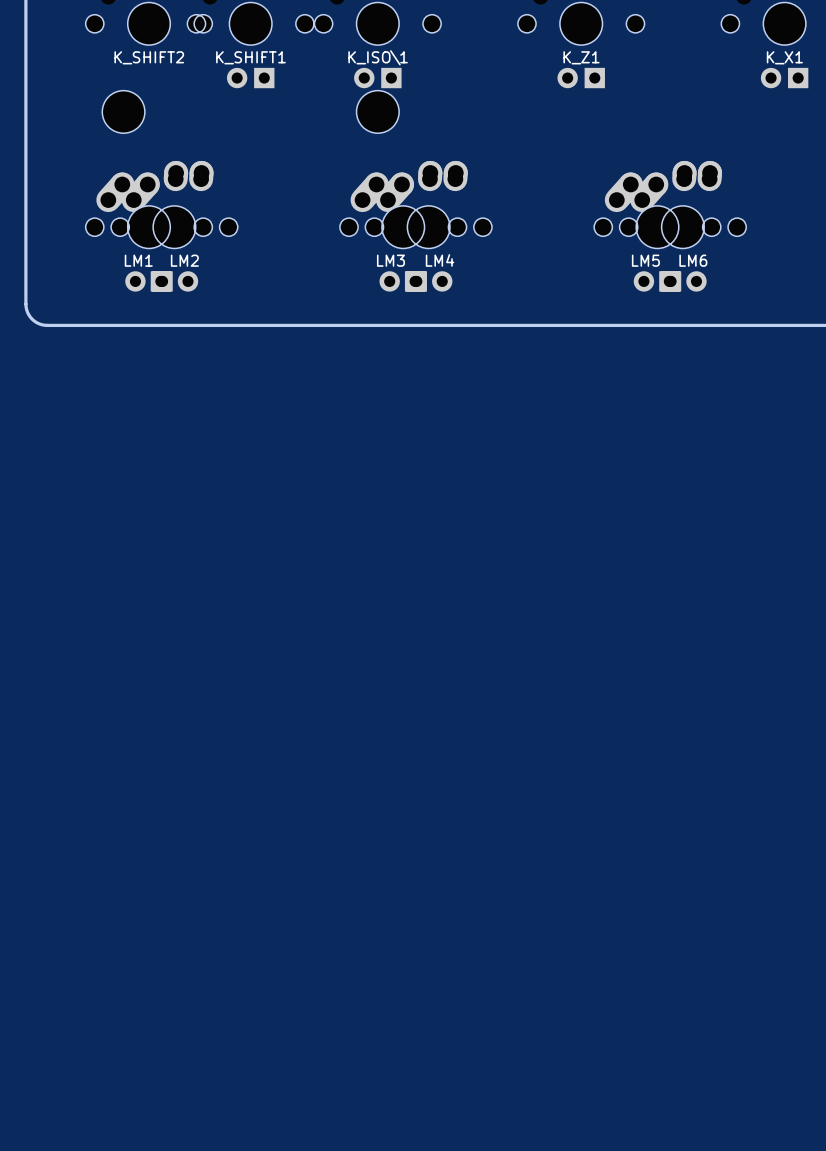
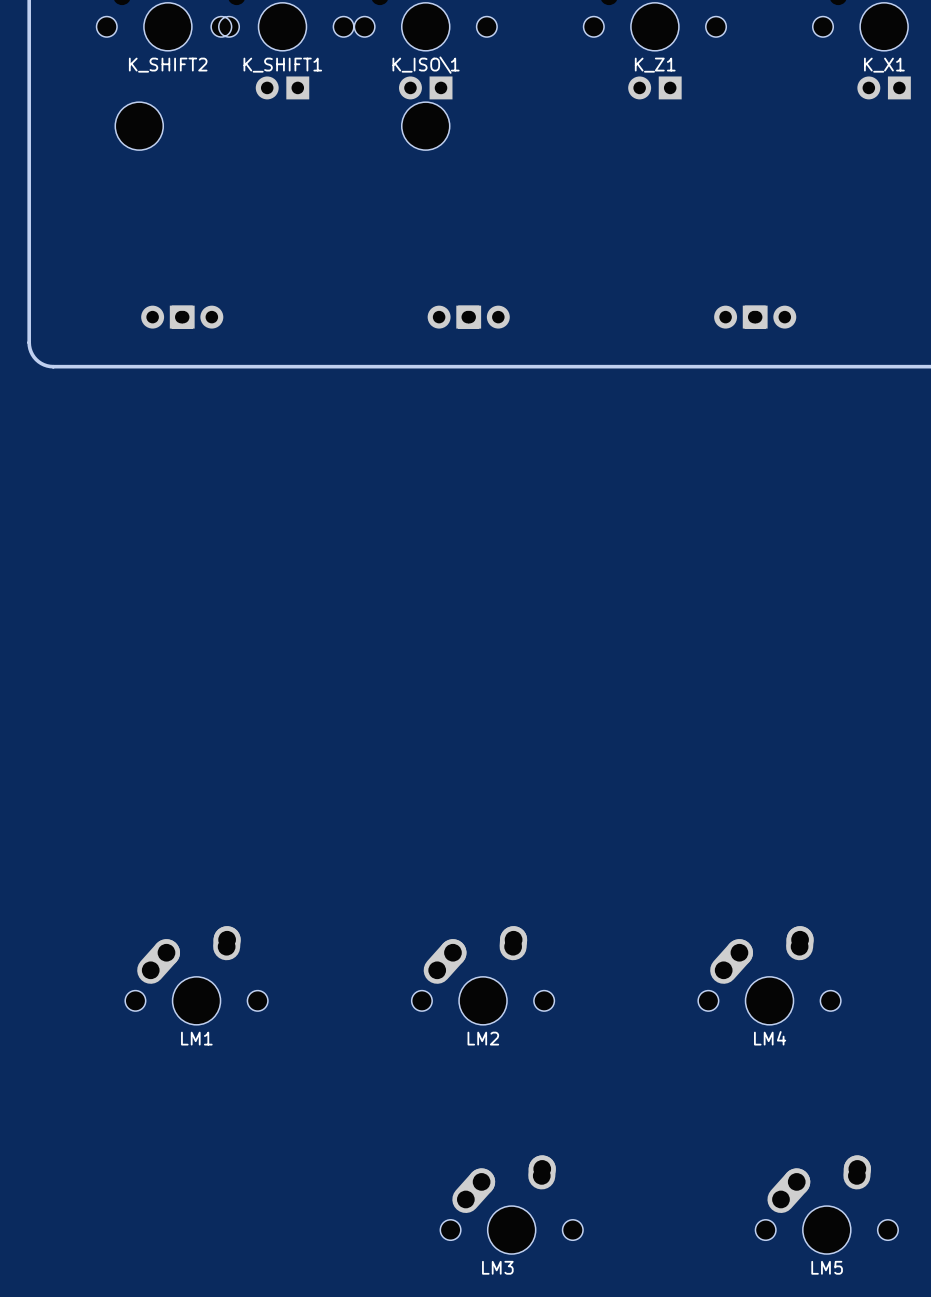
LM1 position: (149, 204) -> (196, 975)
LM2 position: (174, 204) -> (483, 975)
LM3 position: (403, 204) -> (511, 1204)
LM4 position: (428, 204) -> (769, 975)
LM5 position: (657, 204) -> (826, 1204)
LM6: (682, 204) -> none
LM1 name position: LM1 (138, 260) -> LM1 (196, 1038)
LM2 name position: LM2 (184, 260) -> LM2 (483, 1038)
LM4 name position: LM4 (440, 260) -> LM4 (770, 1038)
LM5 name position: LM5 (645, 260) -> LM5 (827, 1267)

